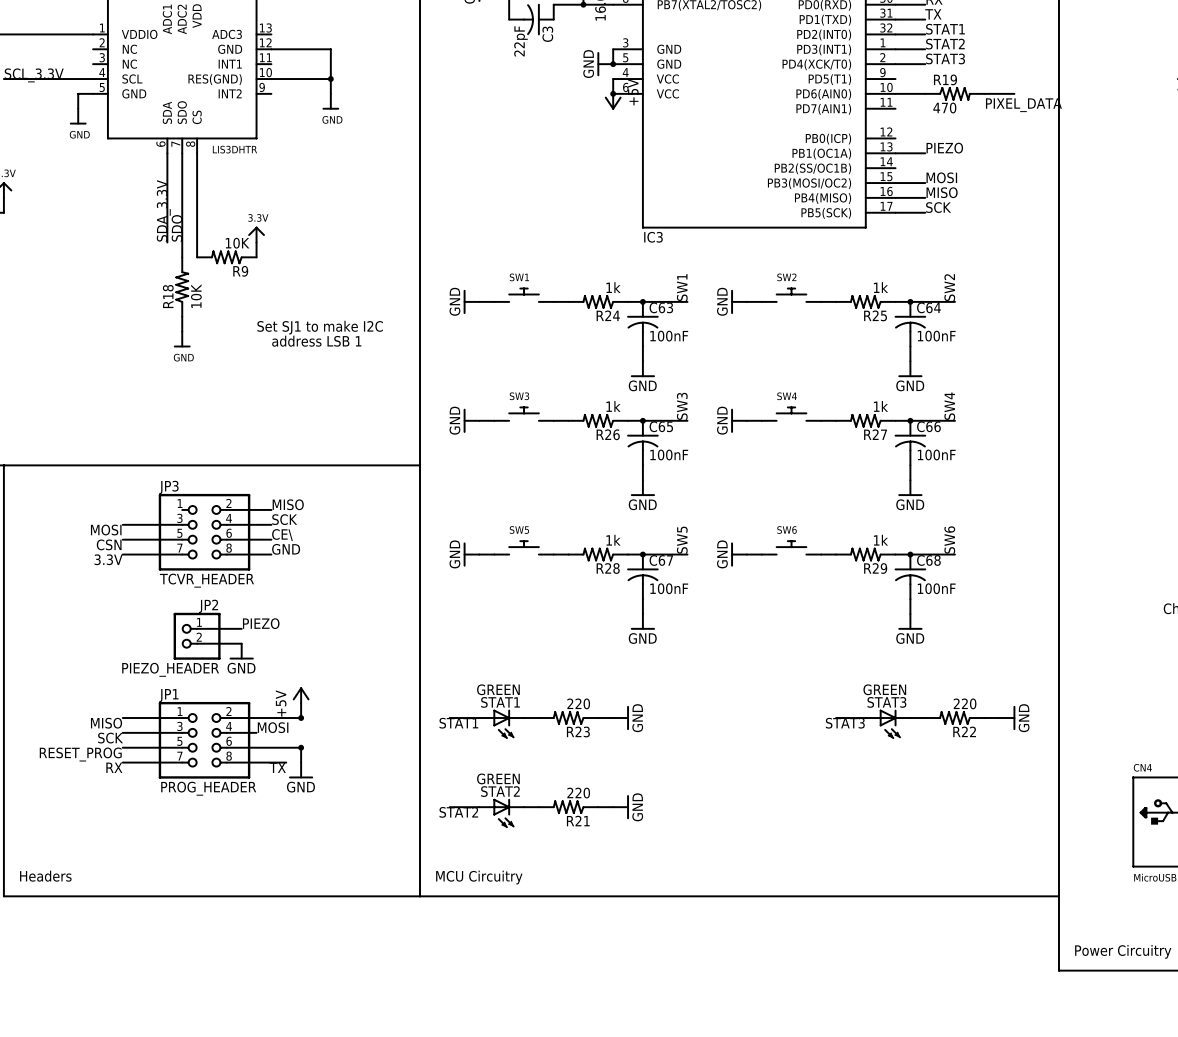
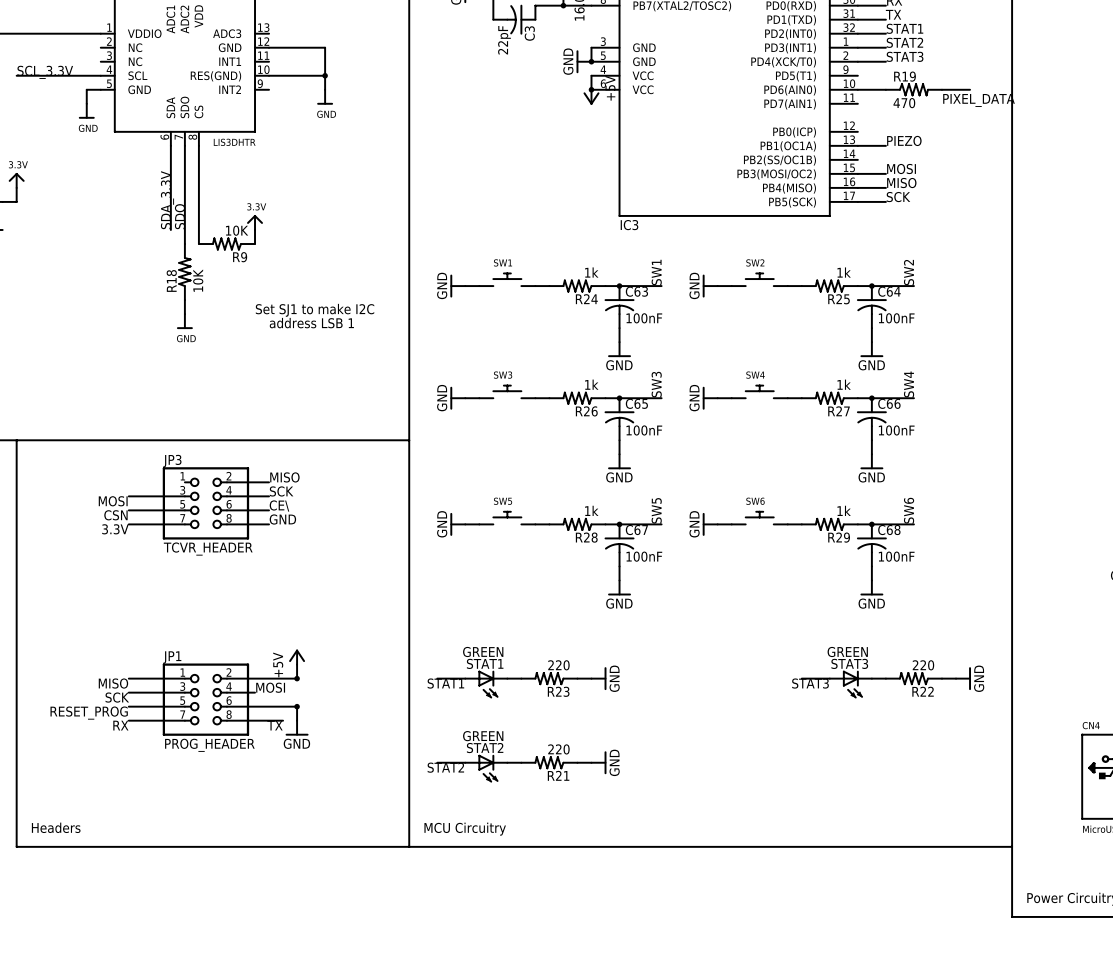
label: PIEZO (261, 623) -> none
wire: (197, 628) (241, 628) -> none
JP2: PIEZO_HEADER (197, 636) -> none
wire: (197, 643) (241, 643) -> none
power symbol: GND (241, 651) -> none

